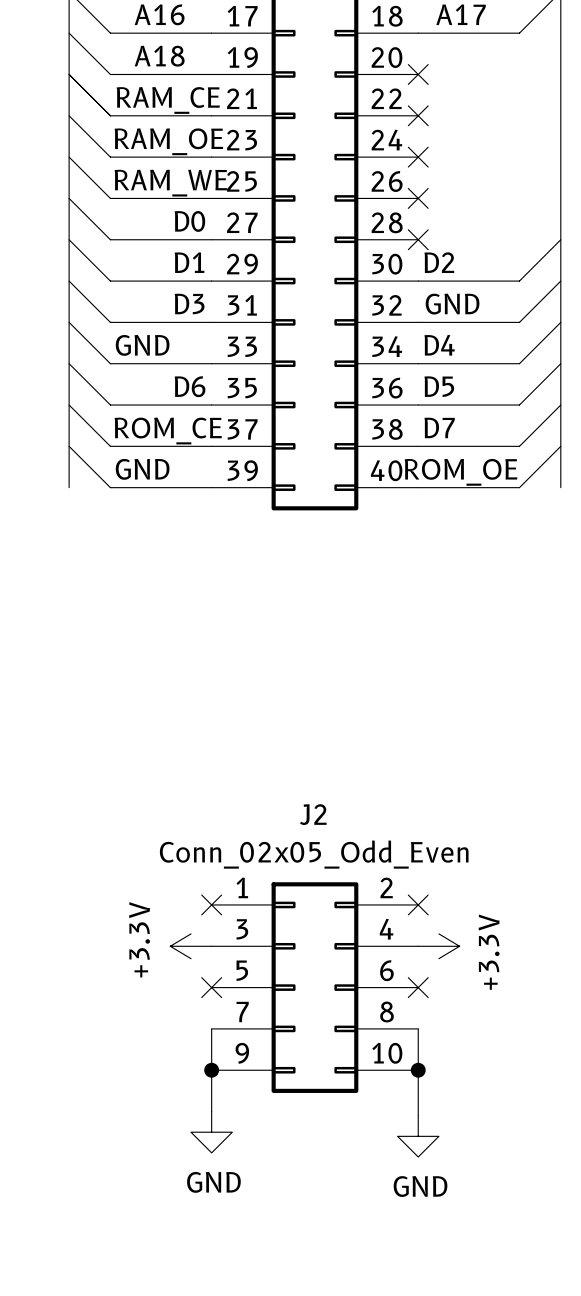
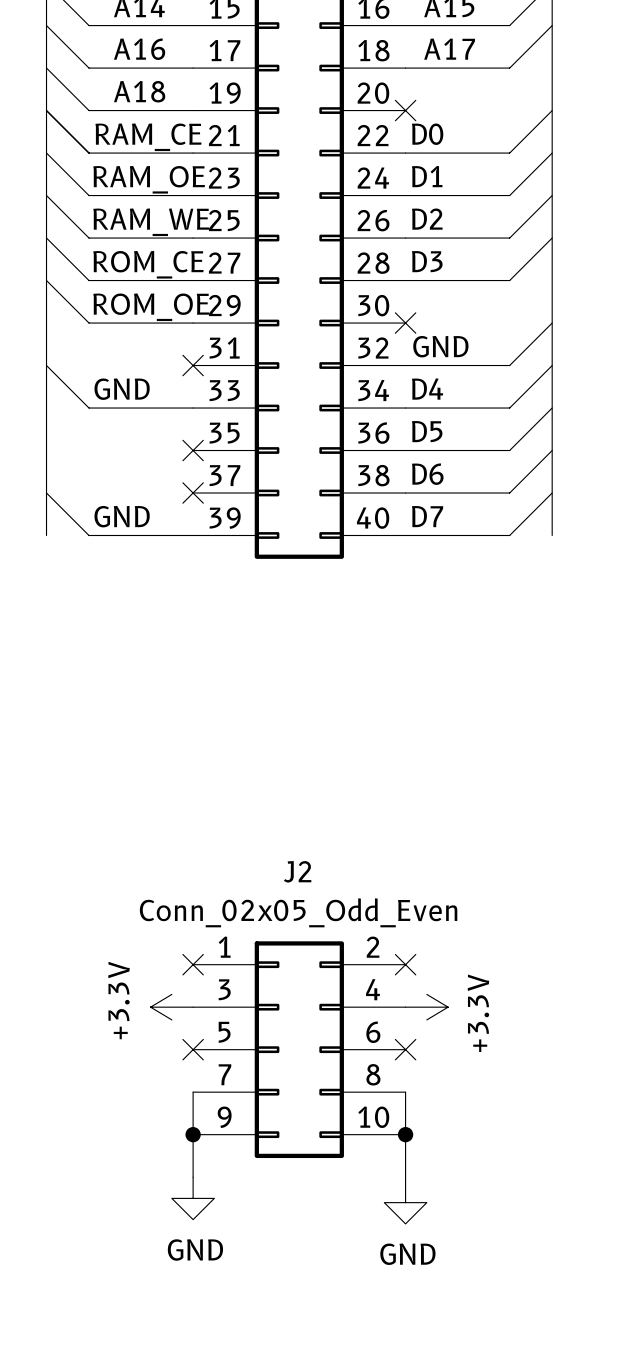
wire: none -> (552, 110) (509, 153) (405, 153)
no-connect mark: (418, 115) -> none
wire: none -> (552, 153) (509, 195) (405, 195)
no-connect mark: (418, 157) -> none
wire: none -> (552, 195) (509, 238) (405, 238)
no-connect mark: (418, 198) -> none
label position: D0 (189, 221) -> D0 (427, 134)
no-connect mark: (418, 239) -> none
wire: (560, 239) (519, 281) (418, 281) -> (552, 238) (509, 280) (405, 280)
label position: D1 (189, 262) -> D1 (427, 176)
label position: D2 (439, 262) -> D2 (427, 219)
label: none -> ROM_OE (151, 307)
wire: (69, 281) (110, 322) (211, 322) -> none
no-connect mark: none -> (405, 323)
label position: D3 (189, 304) -> D3 (427, 261)
no-connect mark: none -> (193, 365)
wire: (69, 363) (110, 405) (211, 405) -> none
label: D6 (190, 386) -> none
wire: (69, 405) (110, 446) (211, 446) -> none
no-connect mark: none -> (193, 450)
label: D7 (439, 427) -> D6 (427, 474)
label position: ROM_CE (168, 431) -> ROM_CE (148, 264)
no-connect mark: none -> (193, 493)
label: none -> D7 (427, 516)
label: ROM_OE (461, 472) -> none

